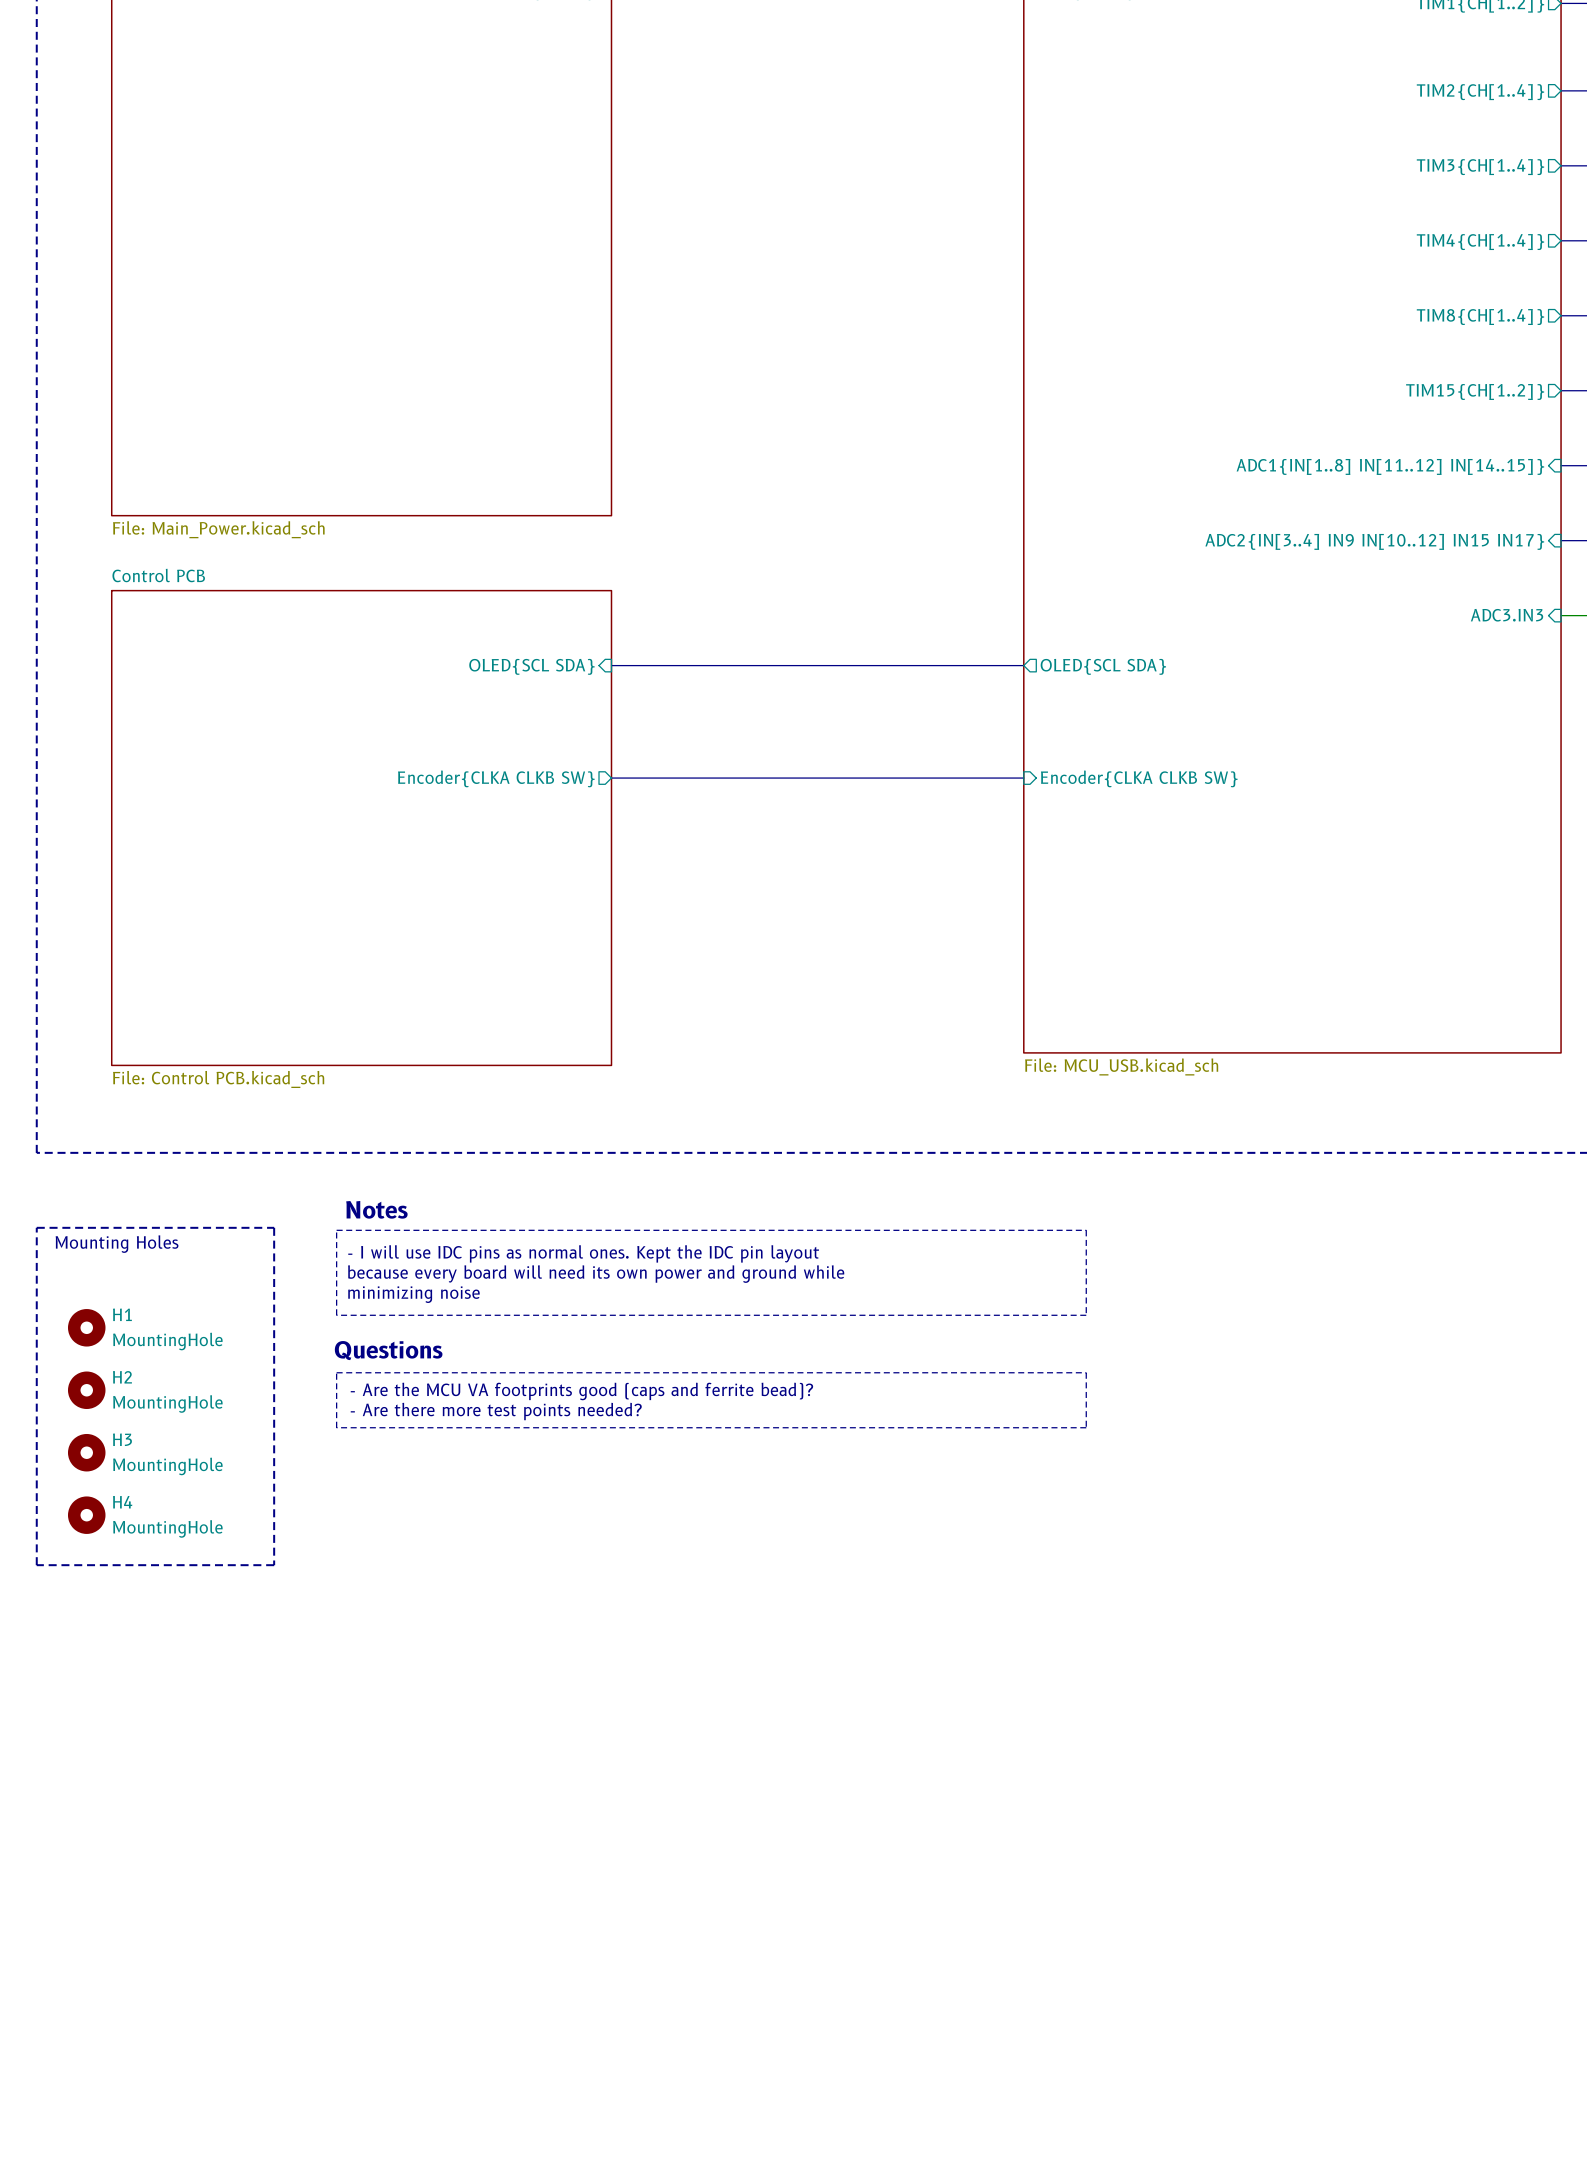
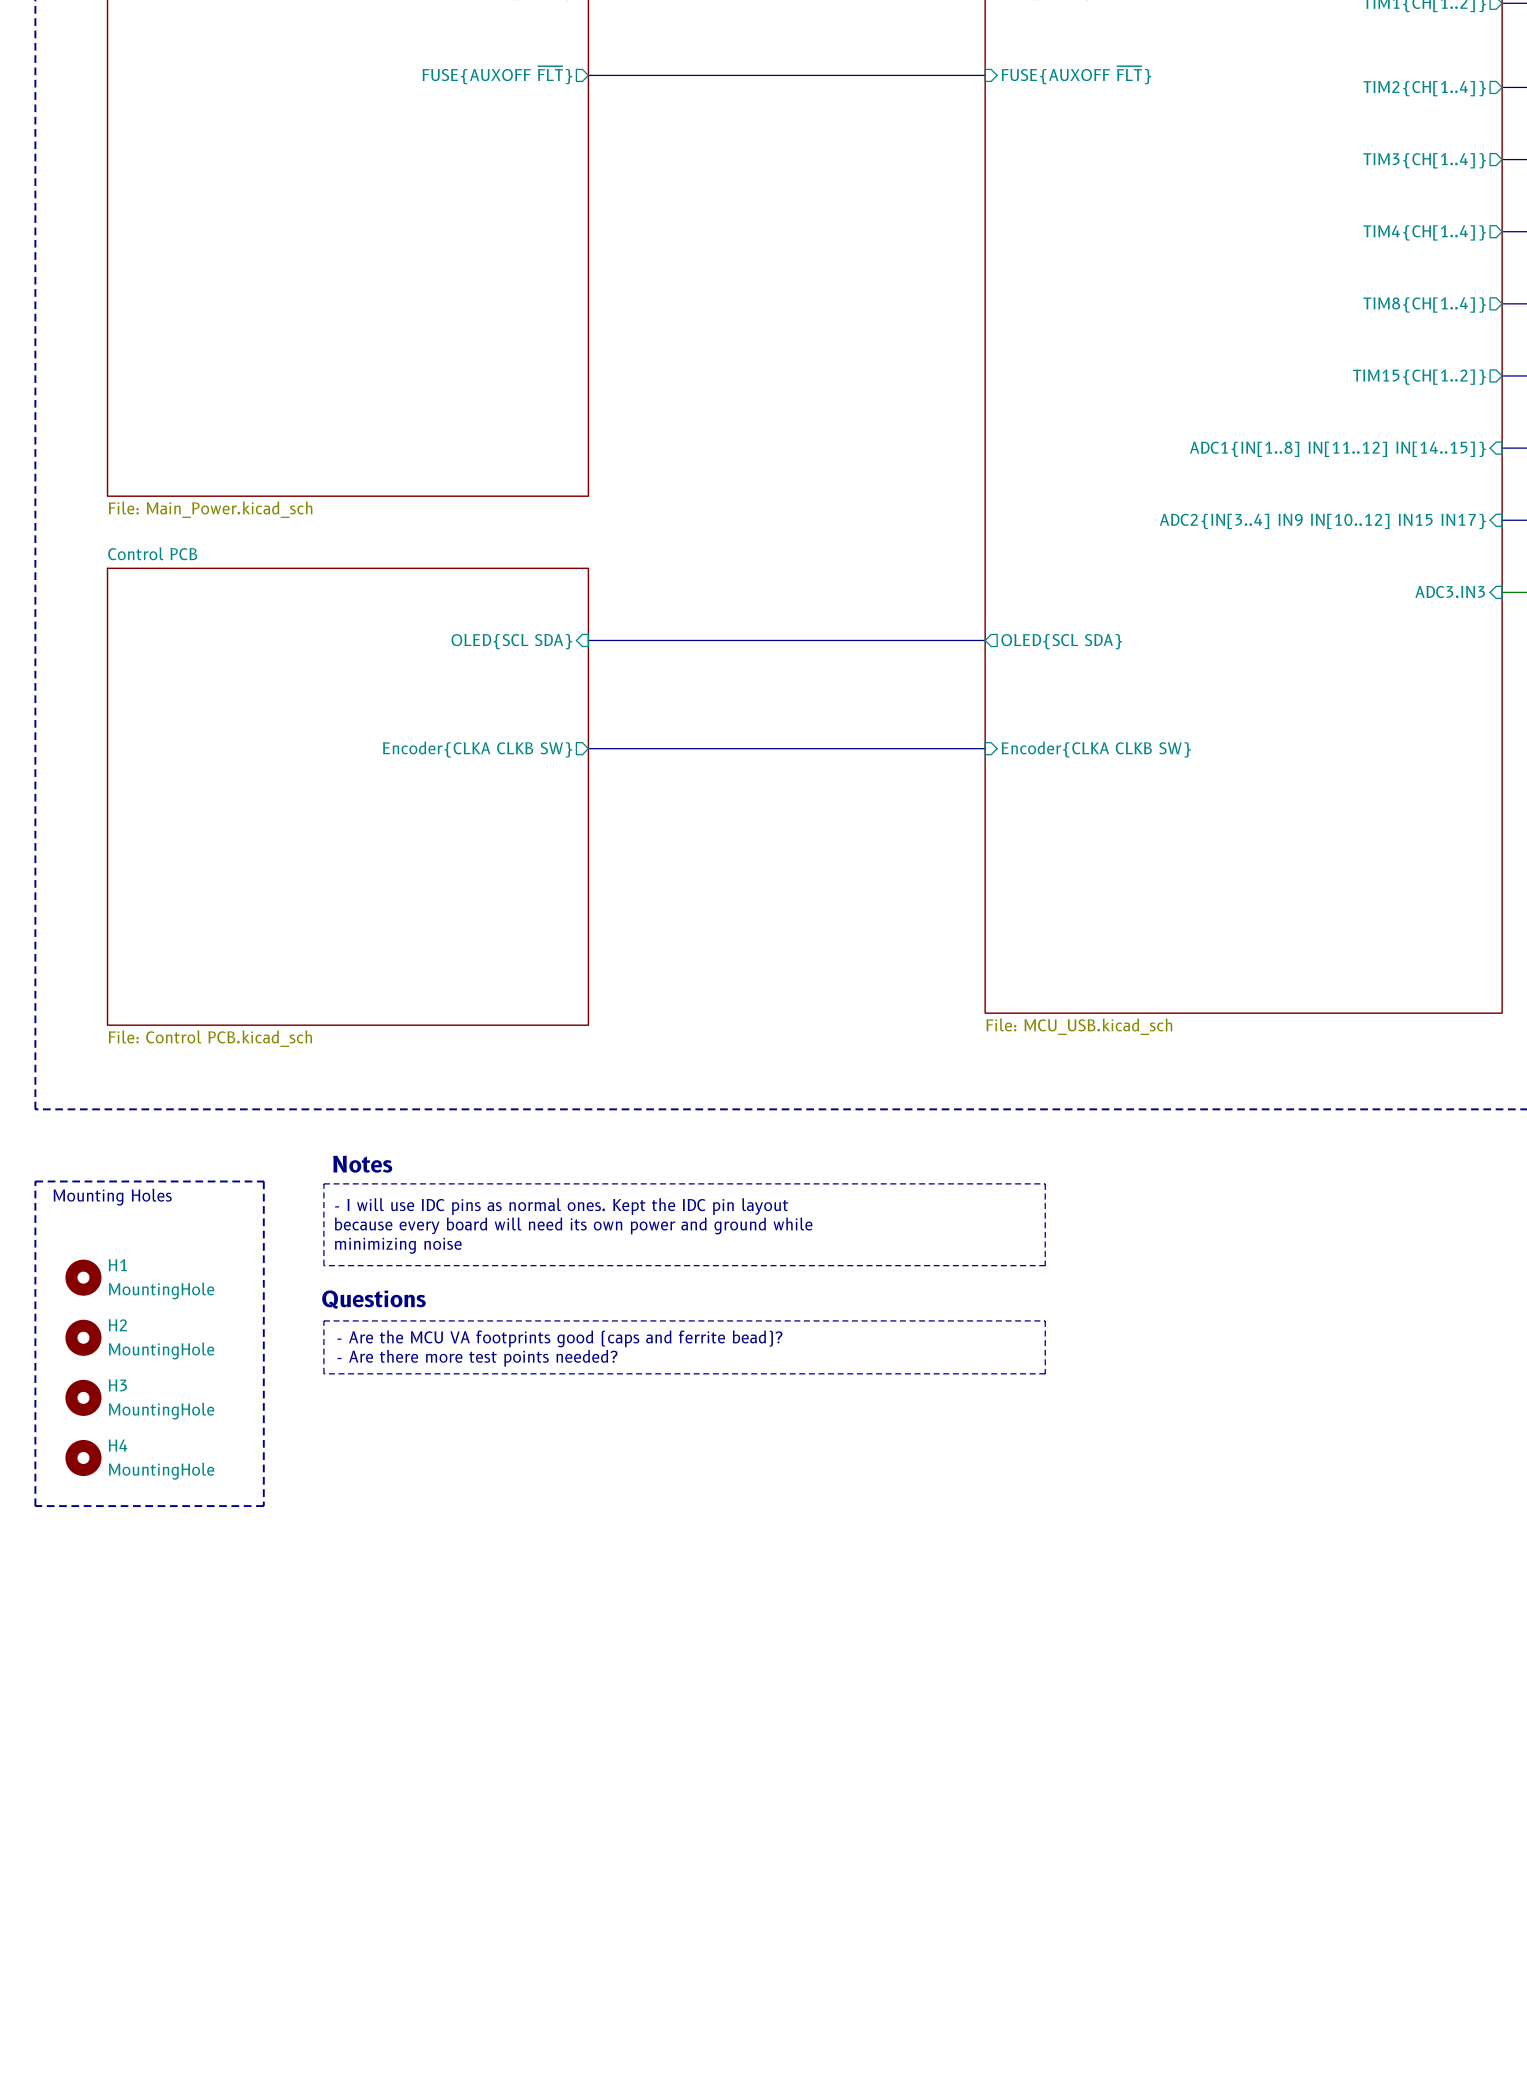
sheet pin: none -> FUSE{AUXOFF ~{FLT}} (497, 75)
bus: none -> (588, 75) (985, 75)
sheet pin: none -> FUSE{AUXOFF ~{FLT}} (1076, 75)

